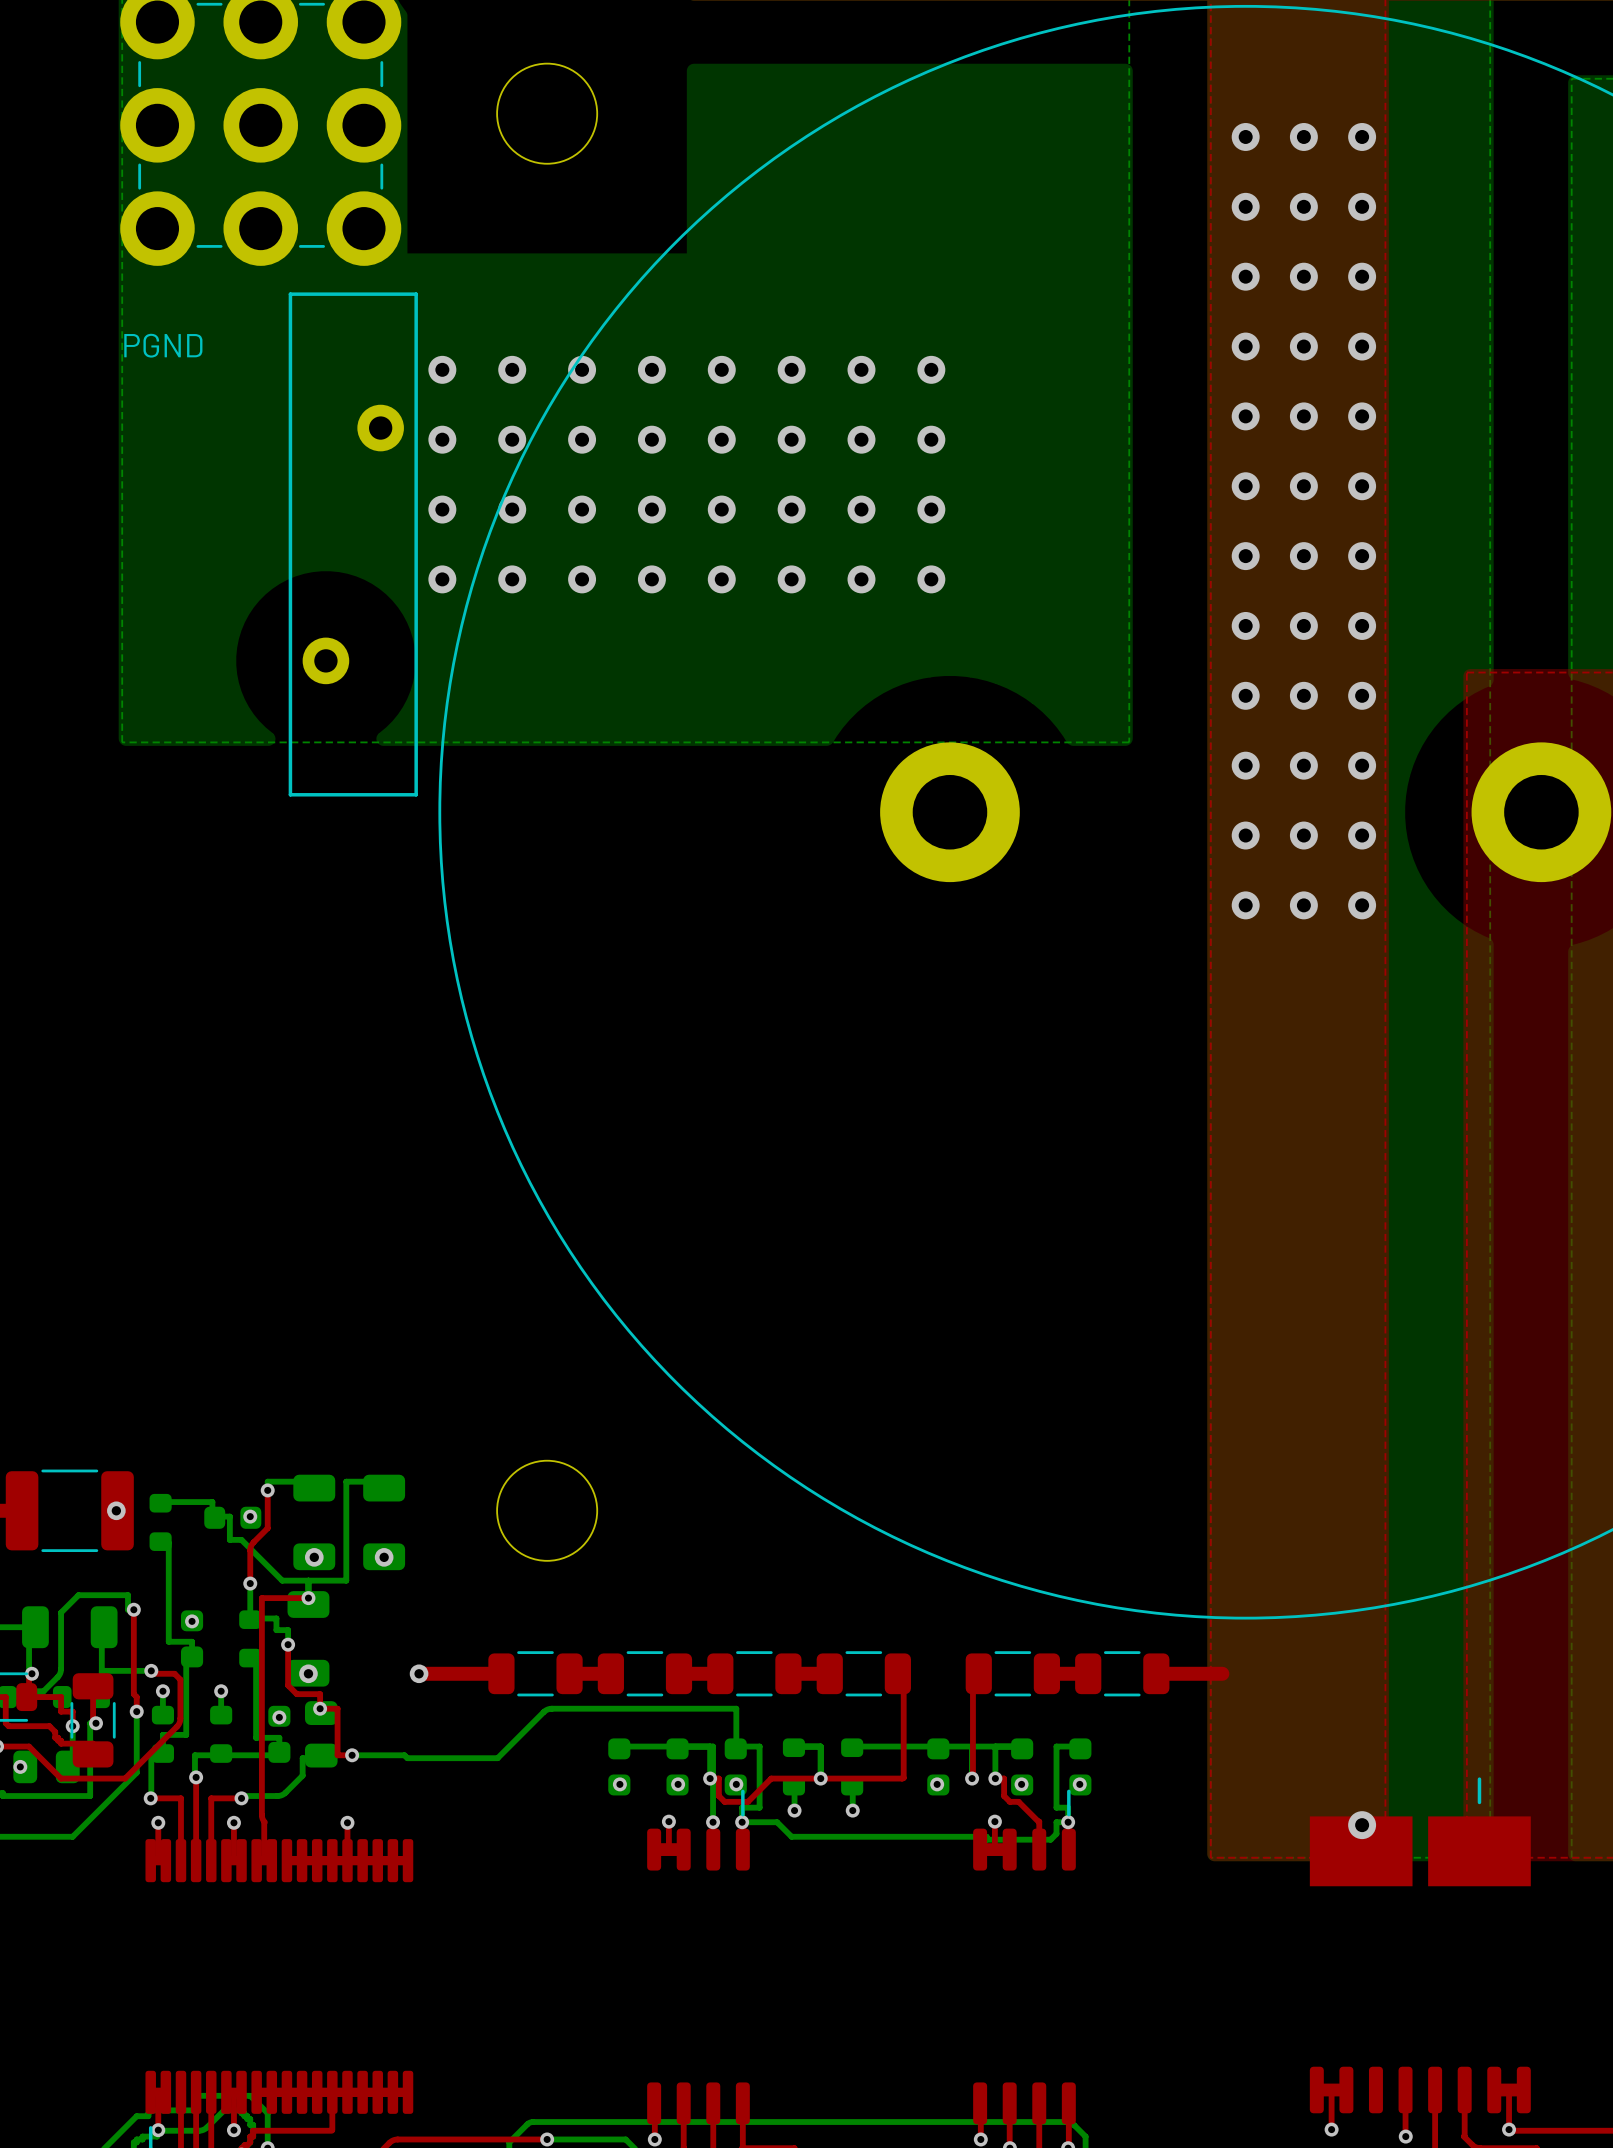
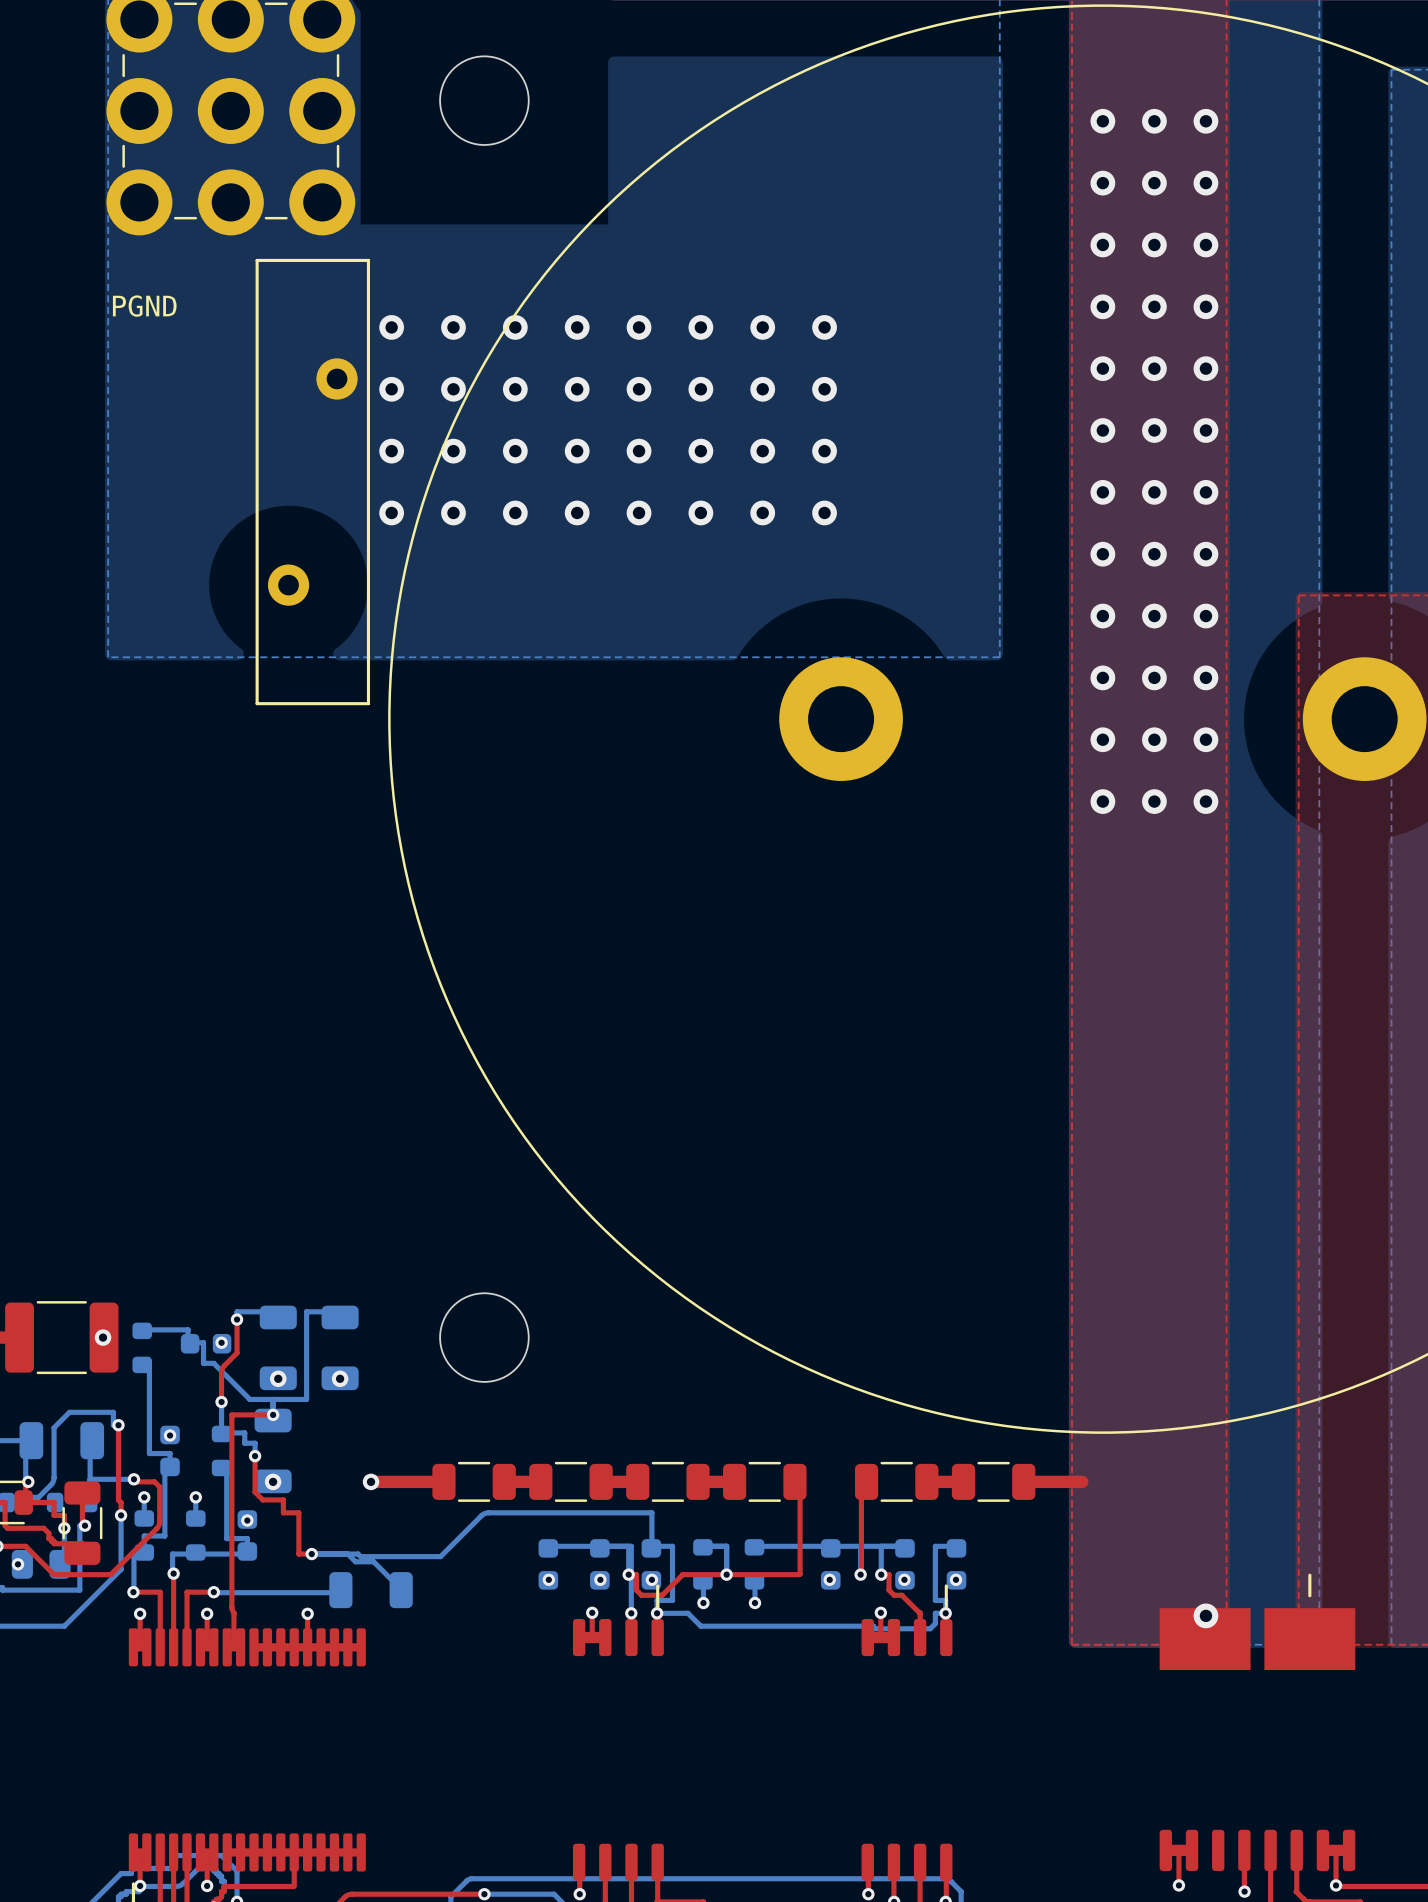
via: (320, 1708) -> none
part: (321, 1734) -> none
bottom track: none -> (347, 1554) (355, 1561) (373, 1561) (401, 1590)
bottom track: (320, 1758) (302, 1758) (302, 1775) (283, 1794) (241, 1796) (241, 1798) -> (340, 1590) (337, 1592) (213, 1592)
part: none -> (371, 1590)

